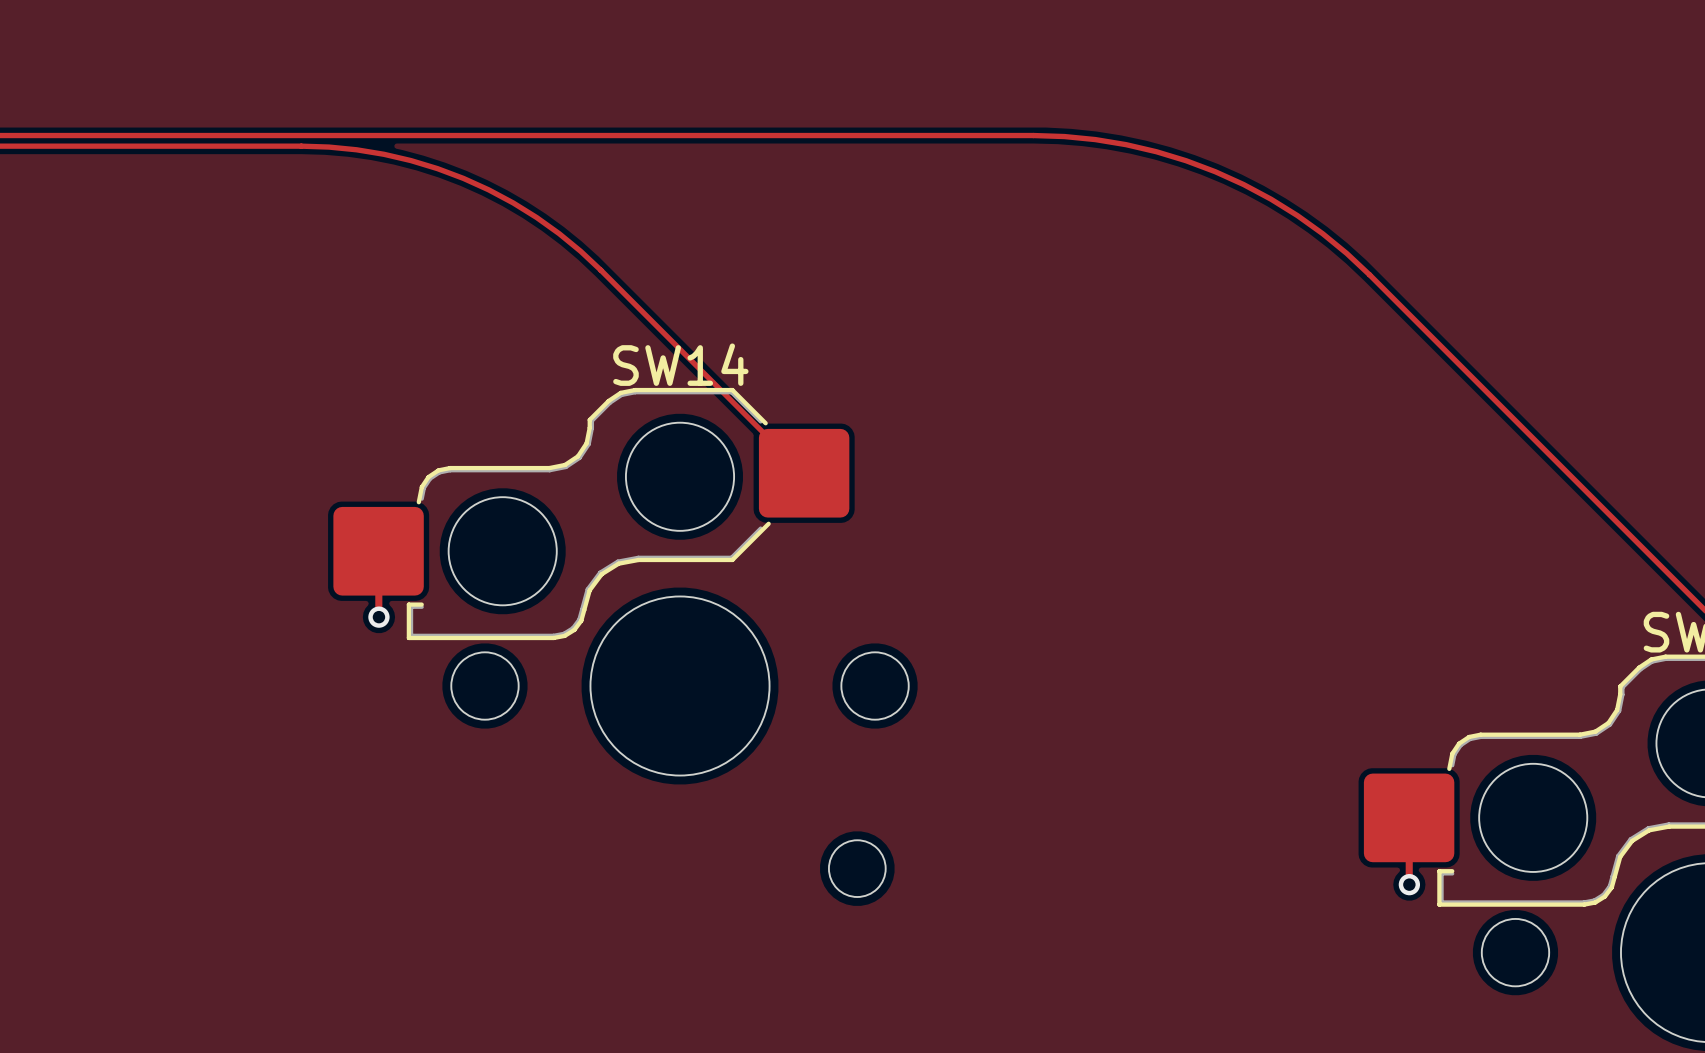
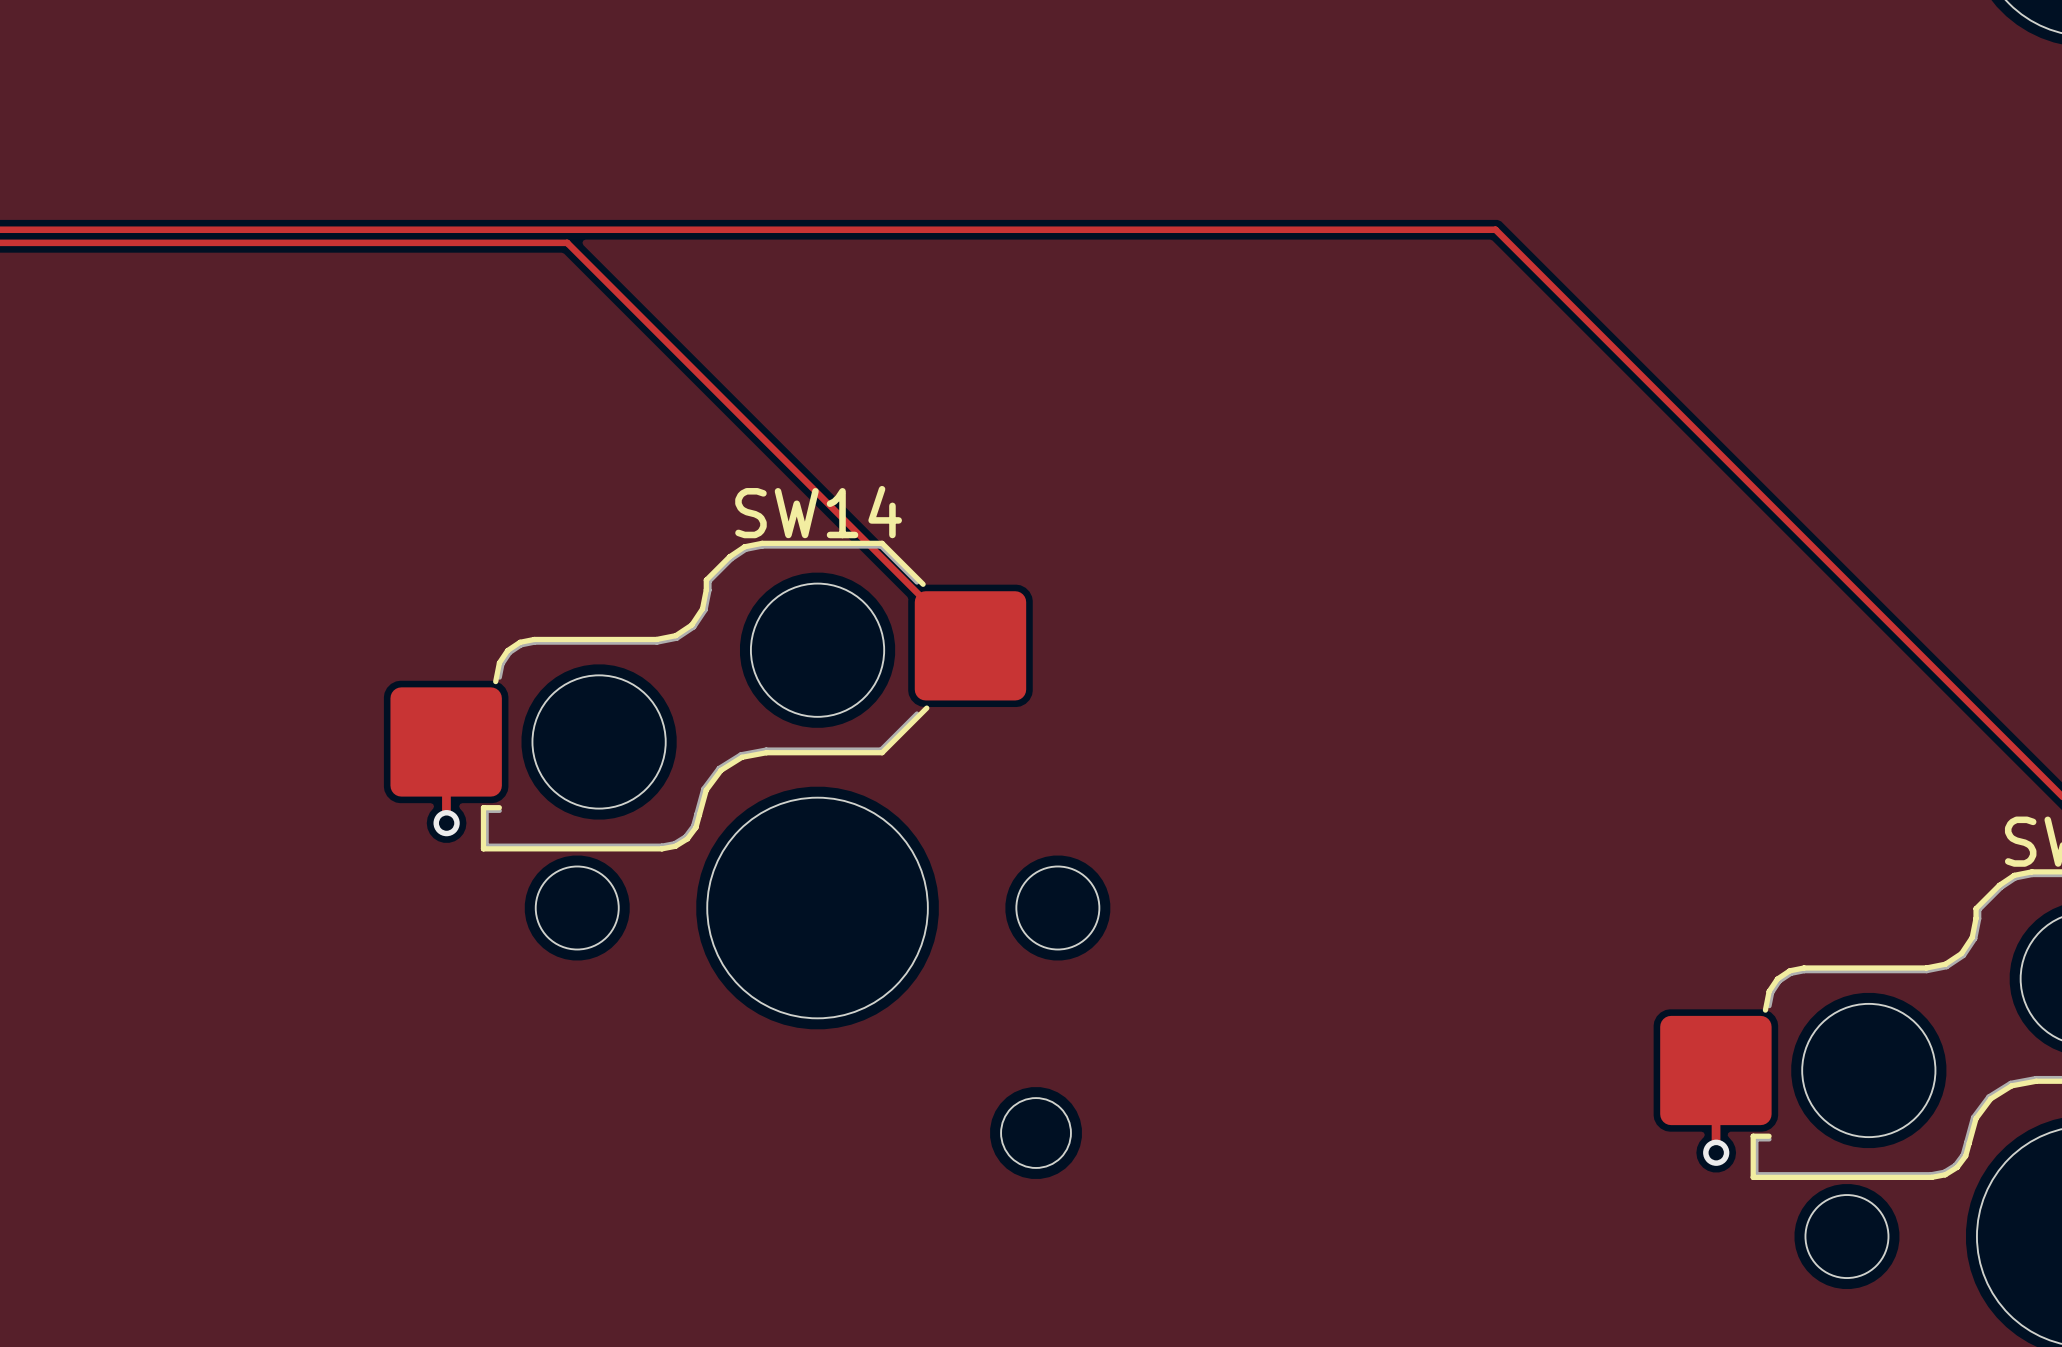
track: (1033, 135) (1064, 136) (1126, 144) (1156, 151) (1215, 171) (1271, 199) (1297, 215) (1322, 233) (1369, 274) -> (1252, 229) (1495, 229) (1667, 401)
track: (301, 146) (356, 149) (384, 154) (411, 160) (463, 178) (488, 189) (536, 217) (559, 233) (600, 270) -> (351, 242) (567, 242) (720, 395)

